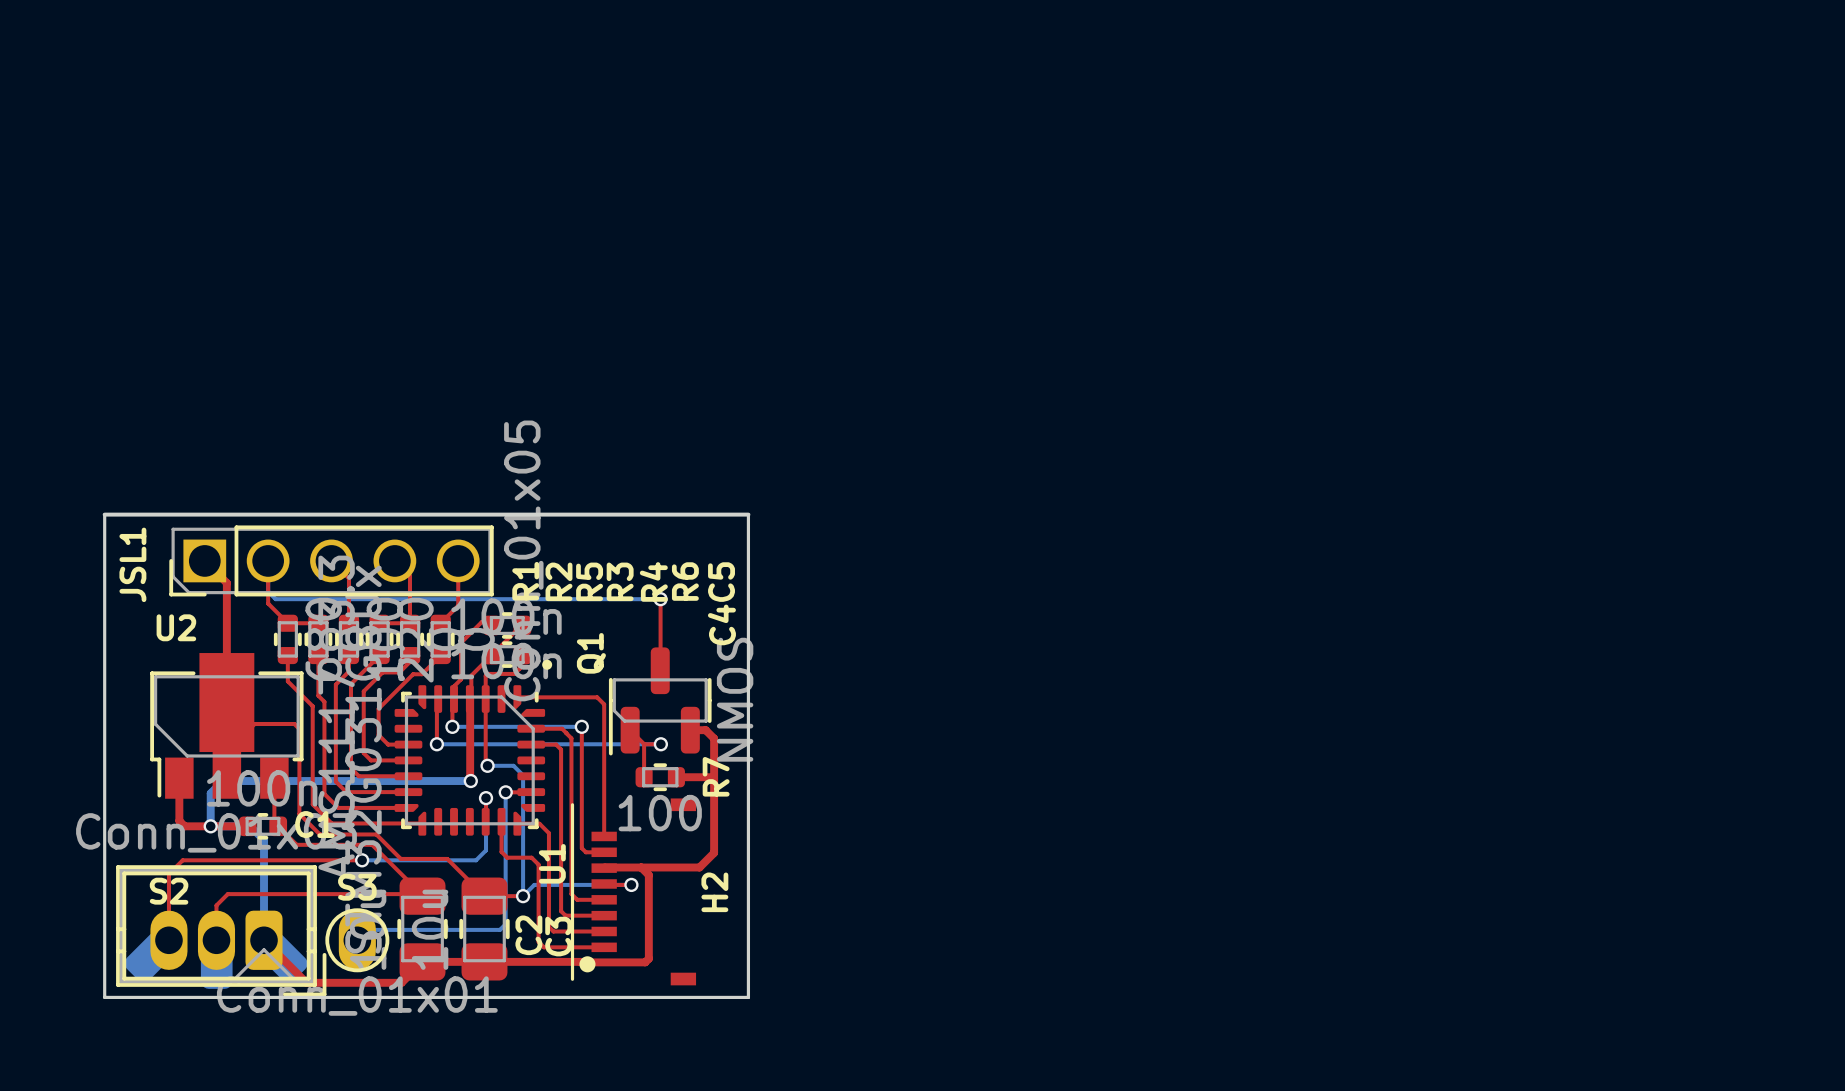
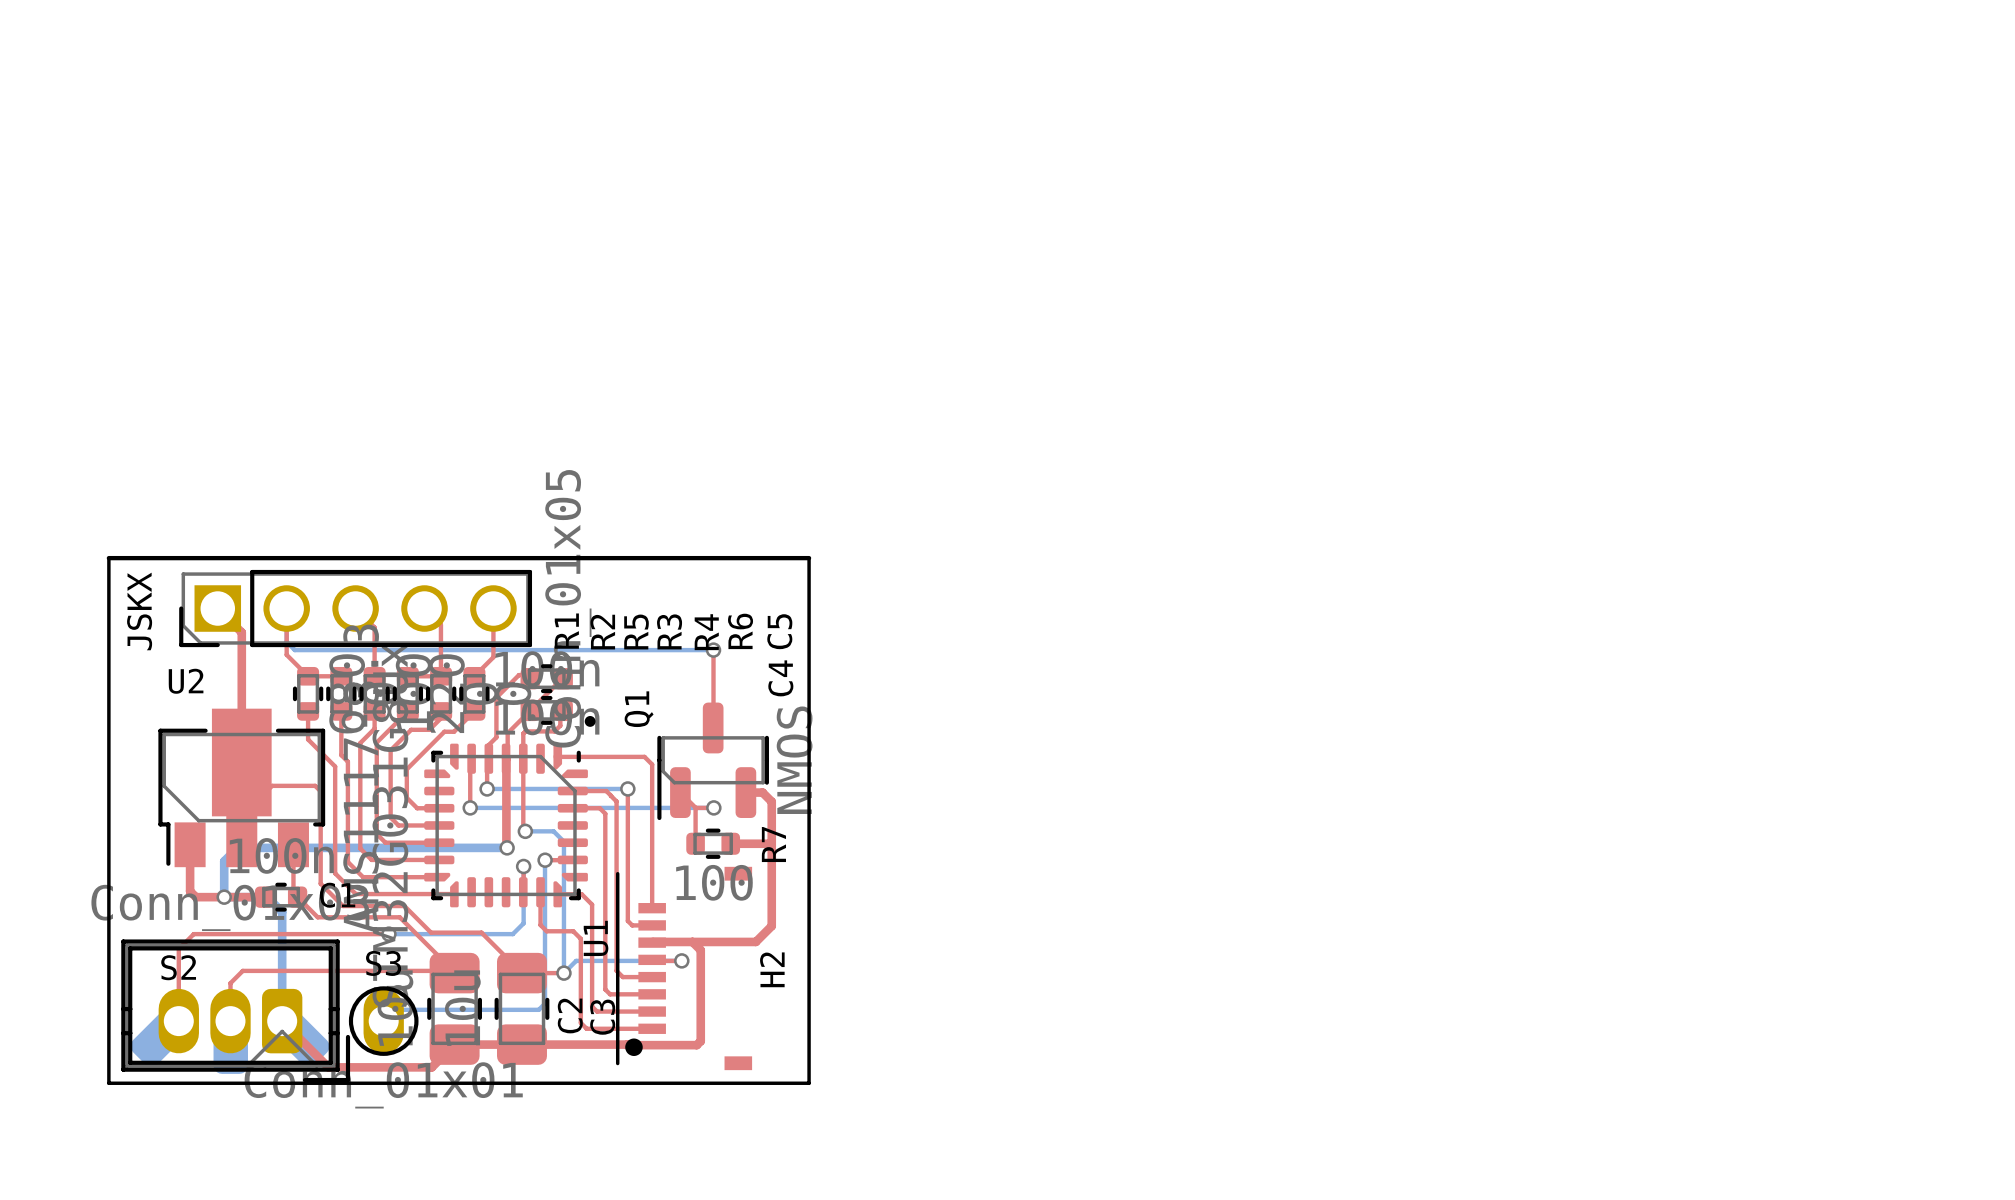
JSL1 name: JSL1 (132, 564) -> JSKX (139, 611)

